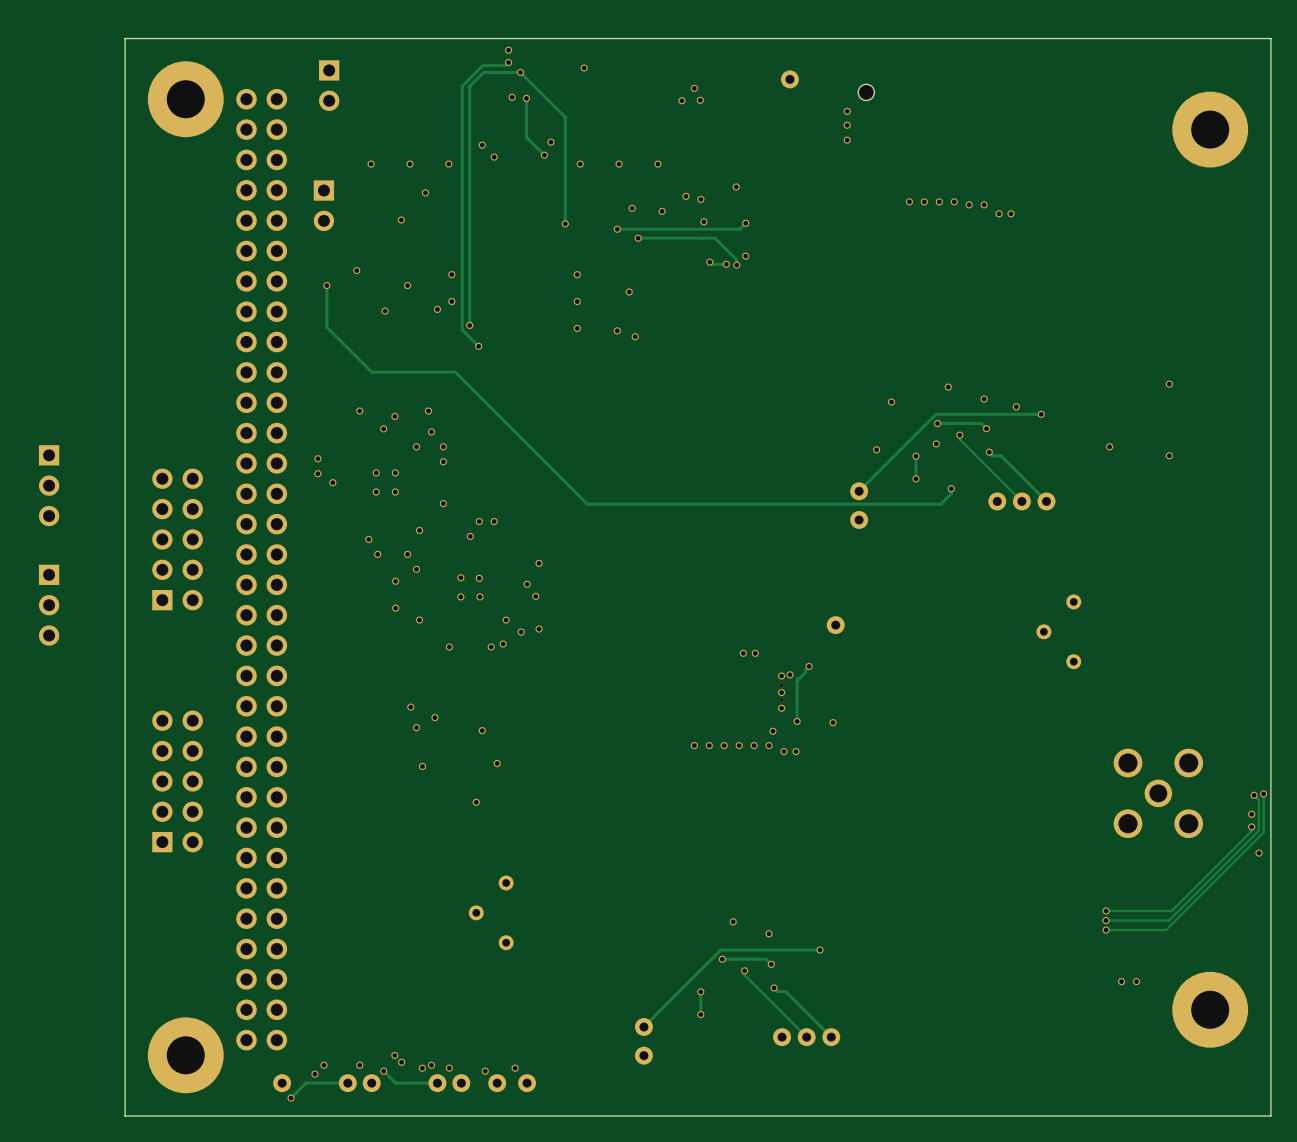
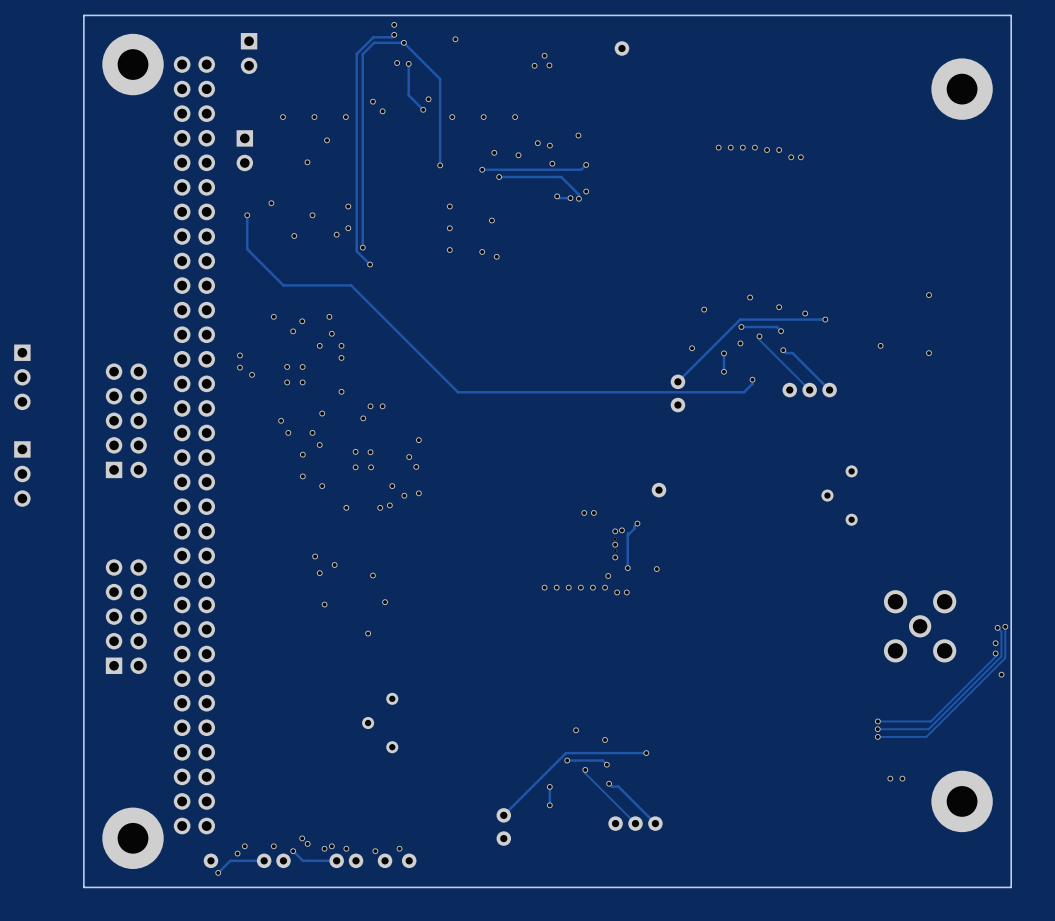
part: (866, 92) -> none
via: (847, 111) -> none
via: (847, 125) -> none
via: (847, 140) -> none

